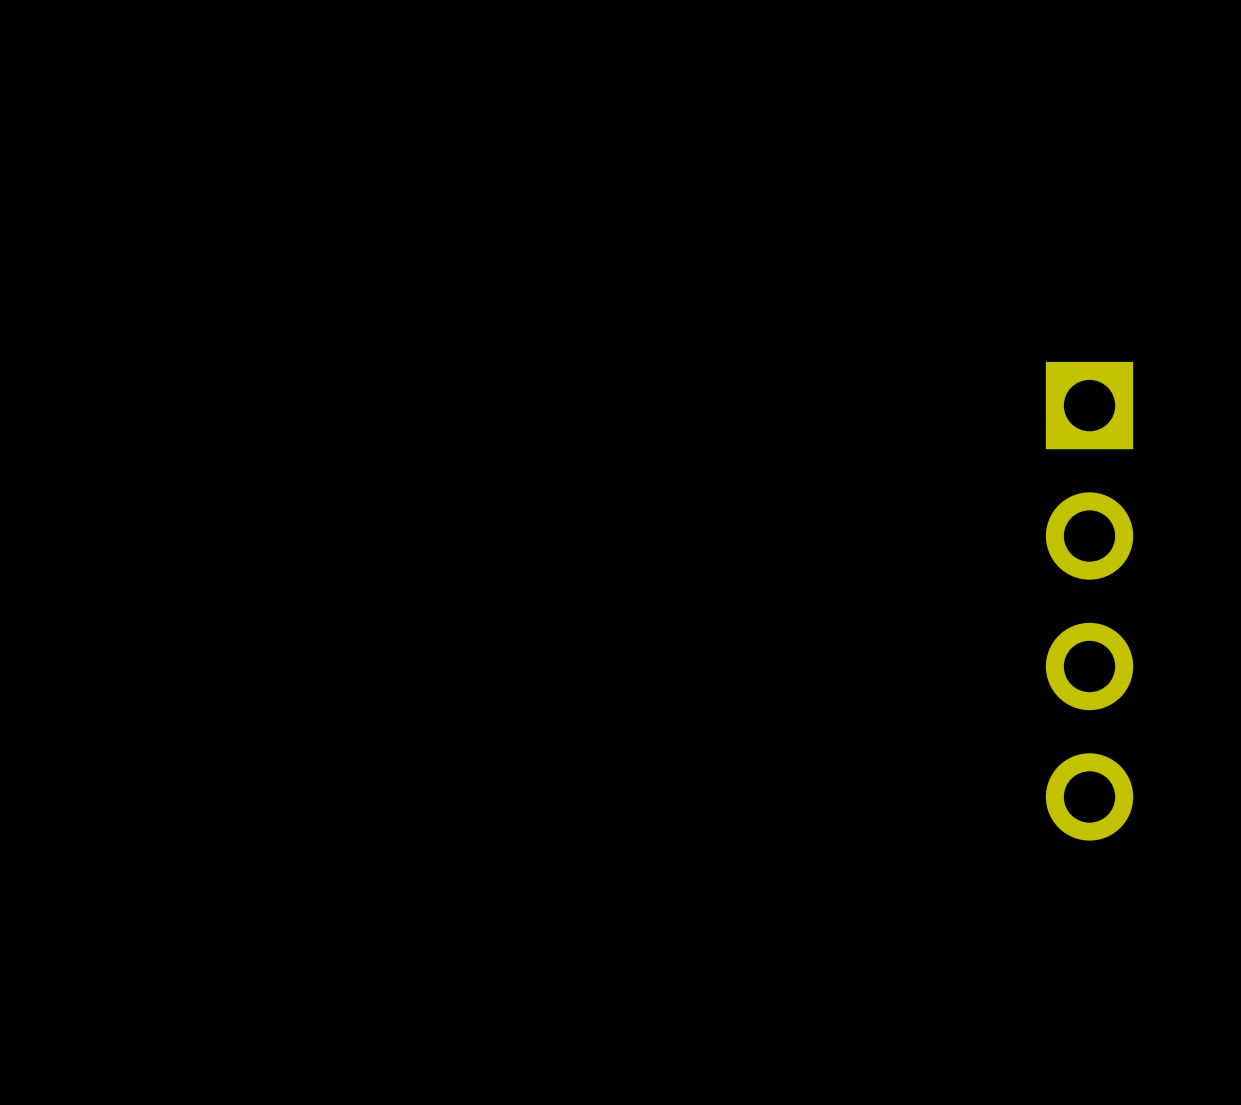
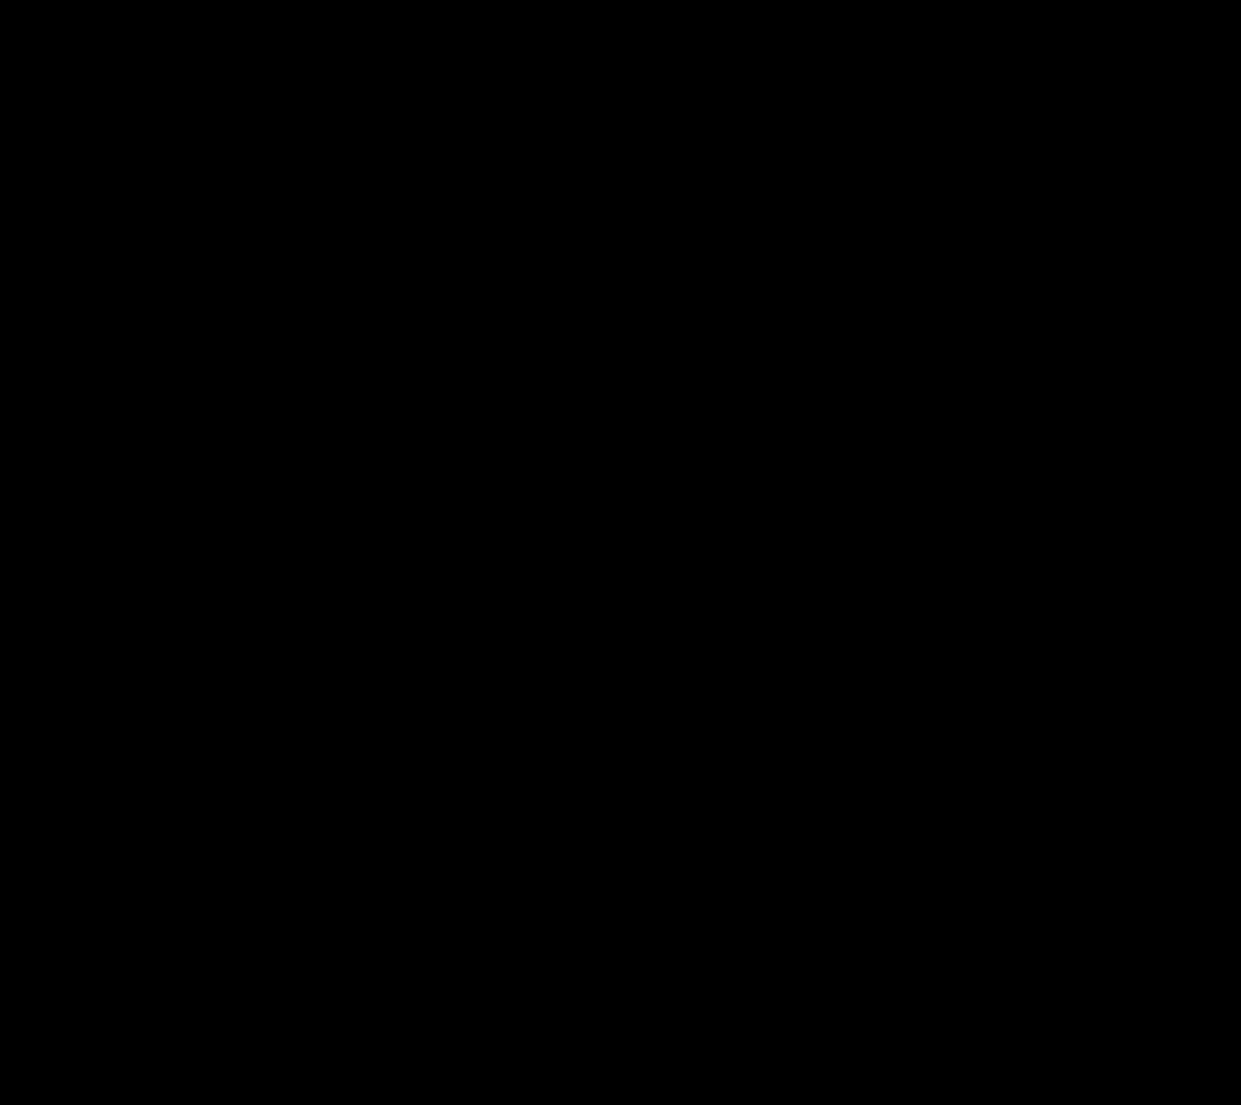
part: (1089, 601) -> none

